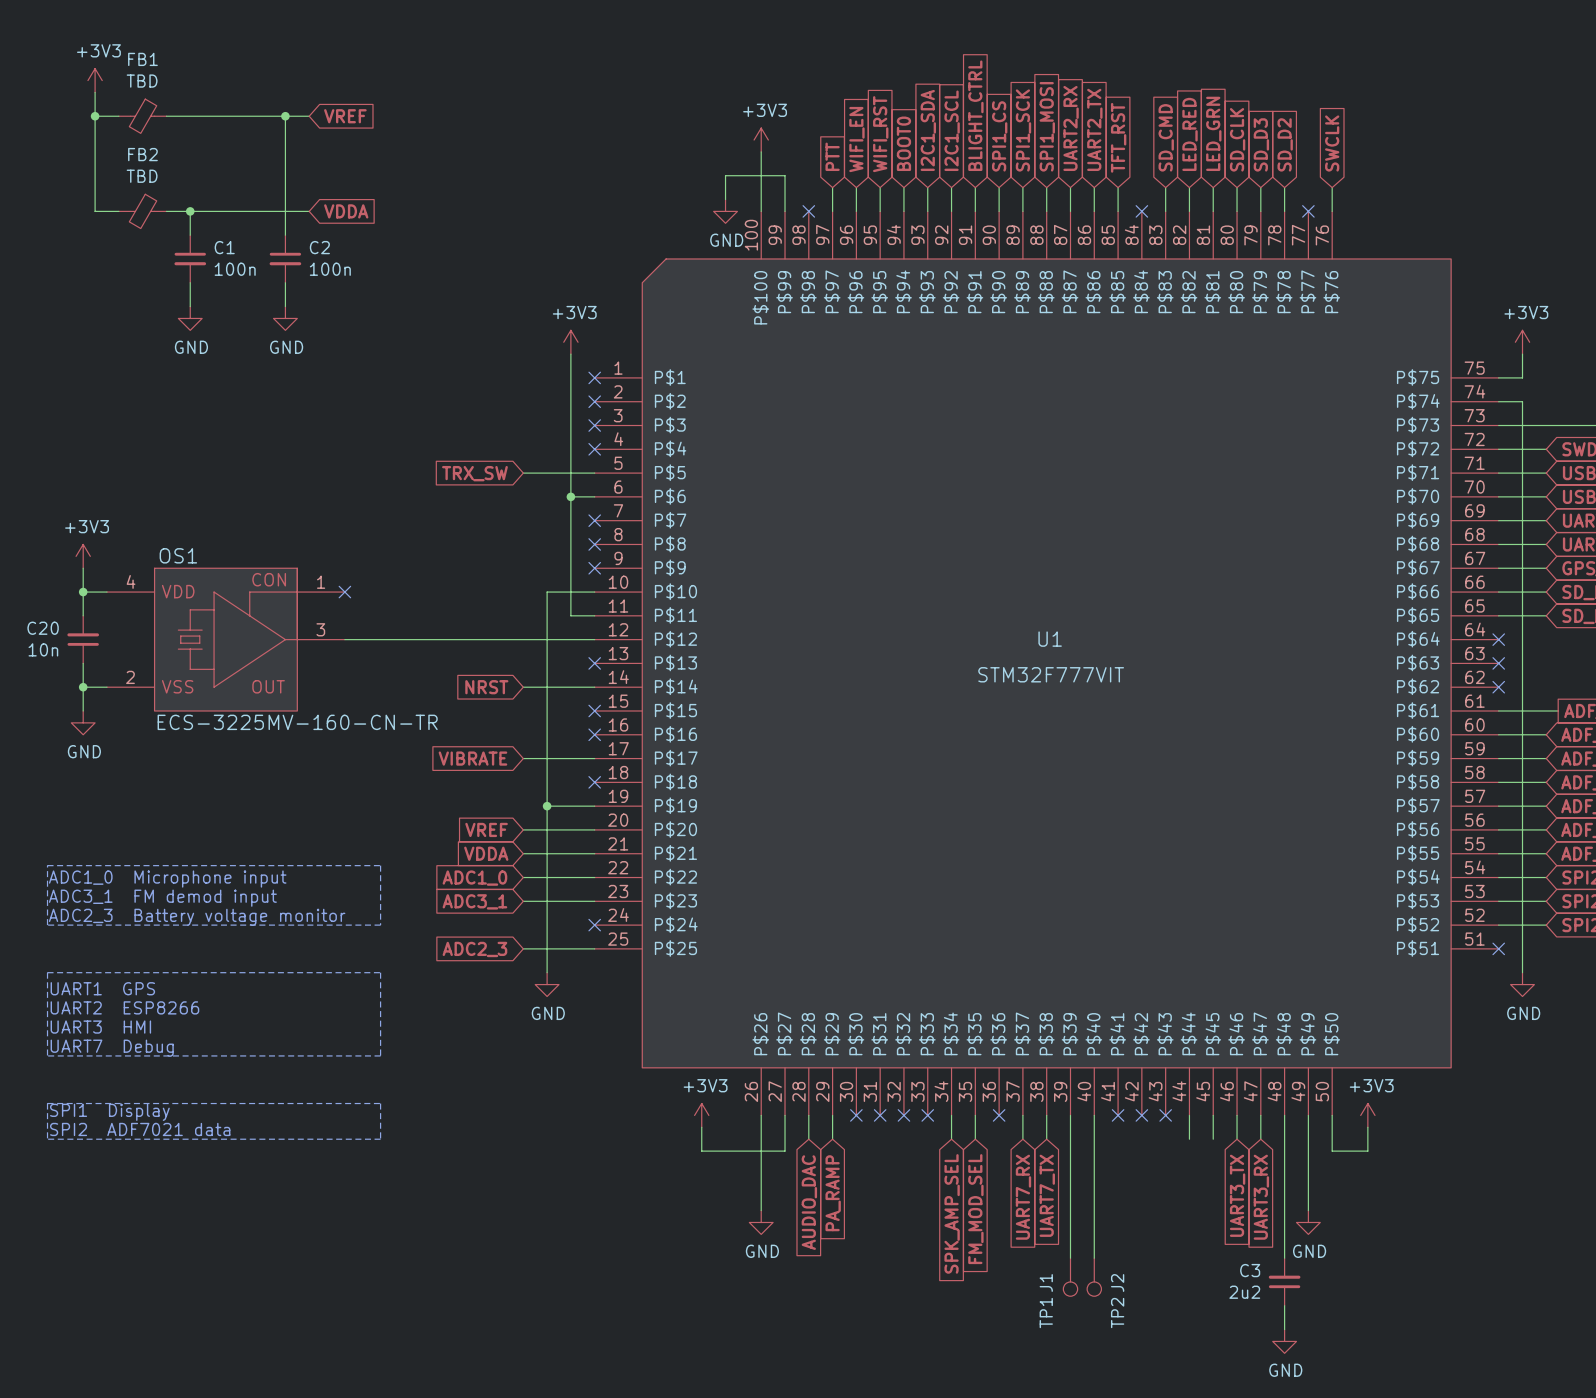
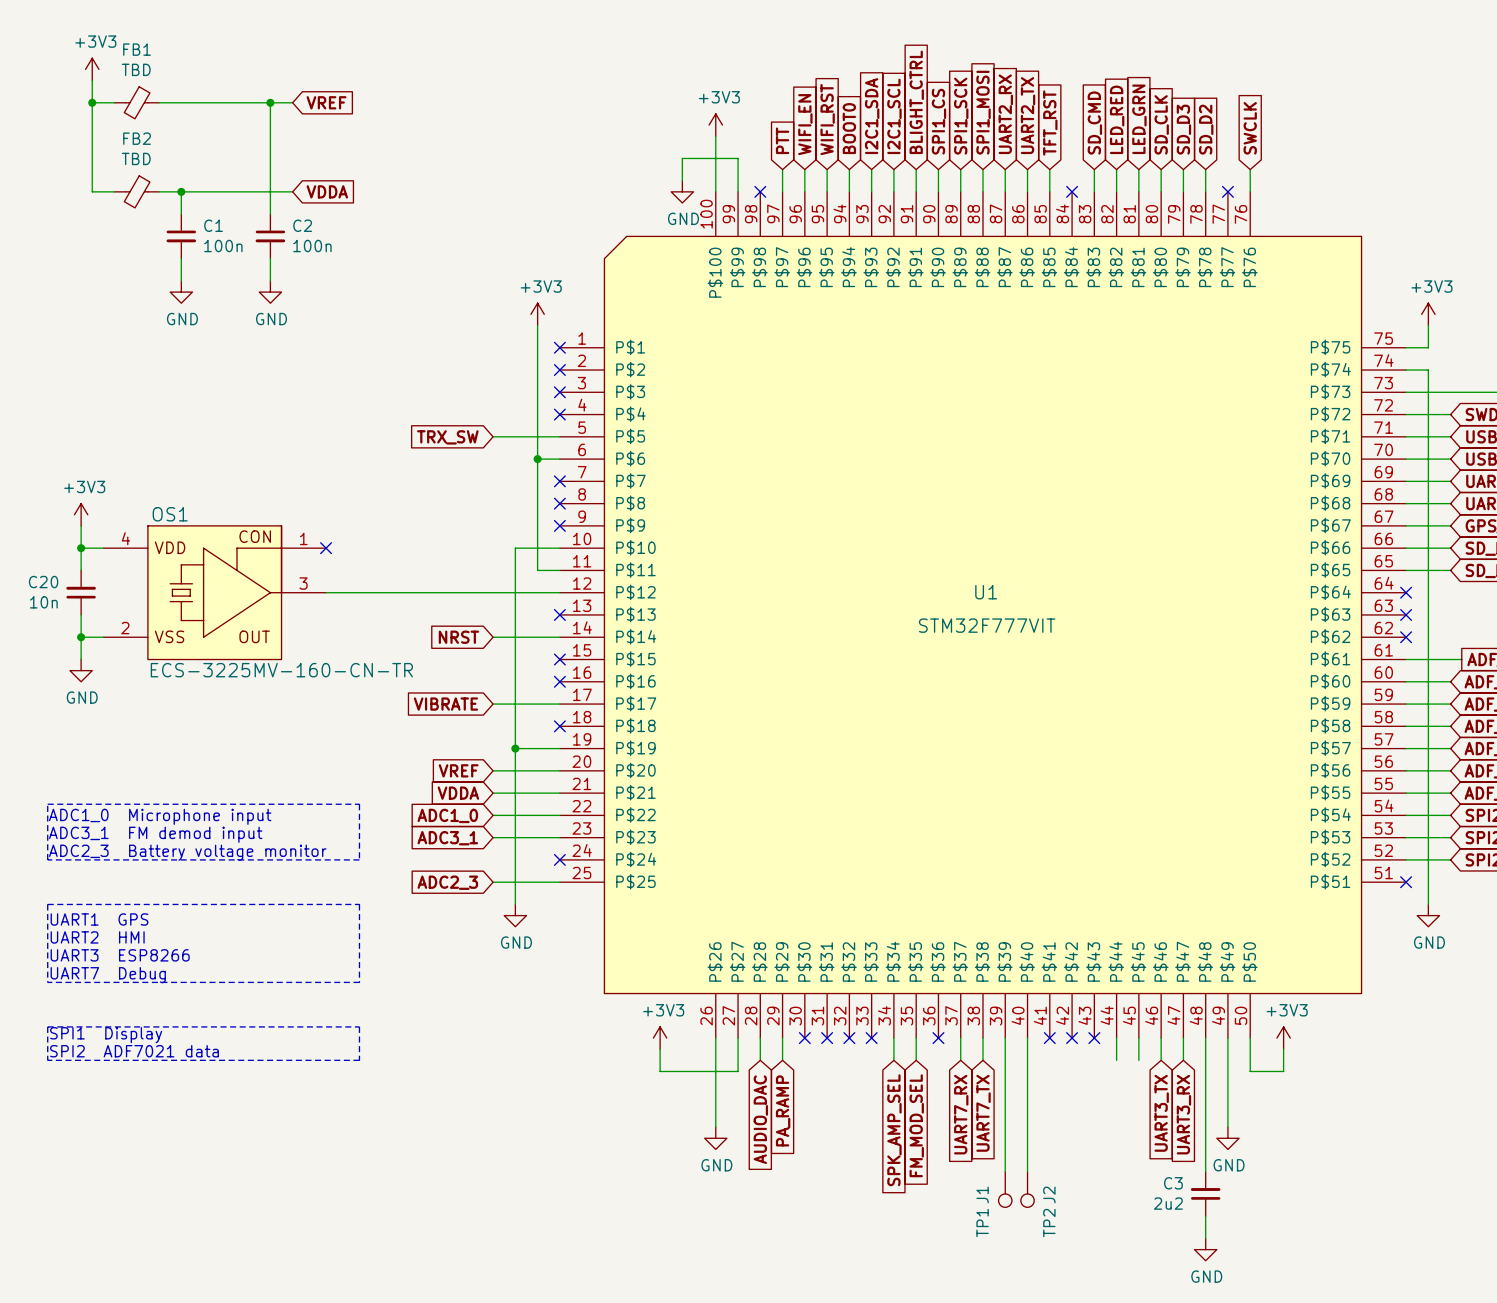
text: UART2 ESP8266 (124, 1007) -> UART2 HMI (97, 937)
text: UART3 HMI (100, 1027) -> UART3 ESP8266 (120, 955)

